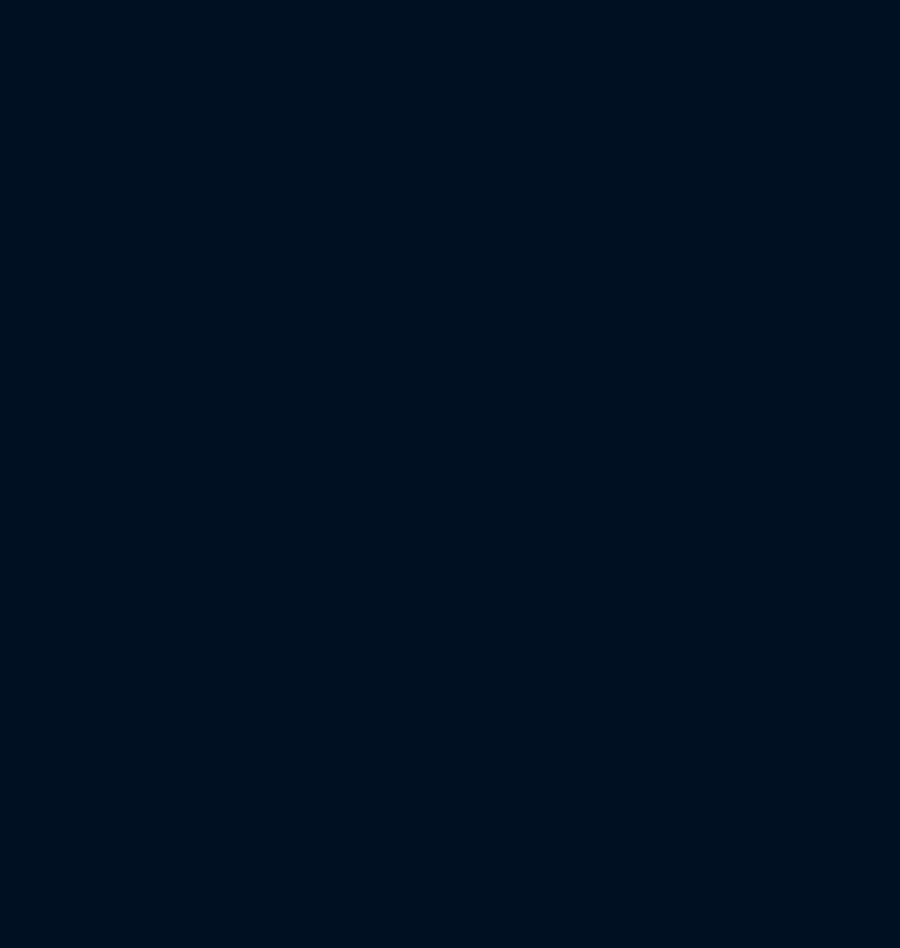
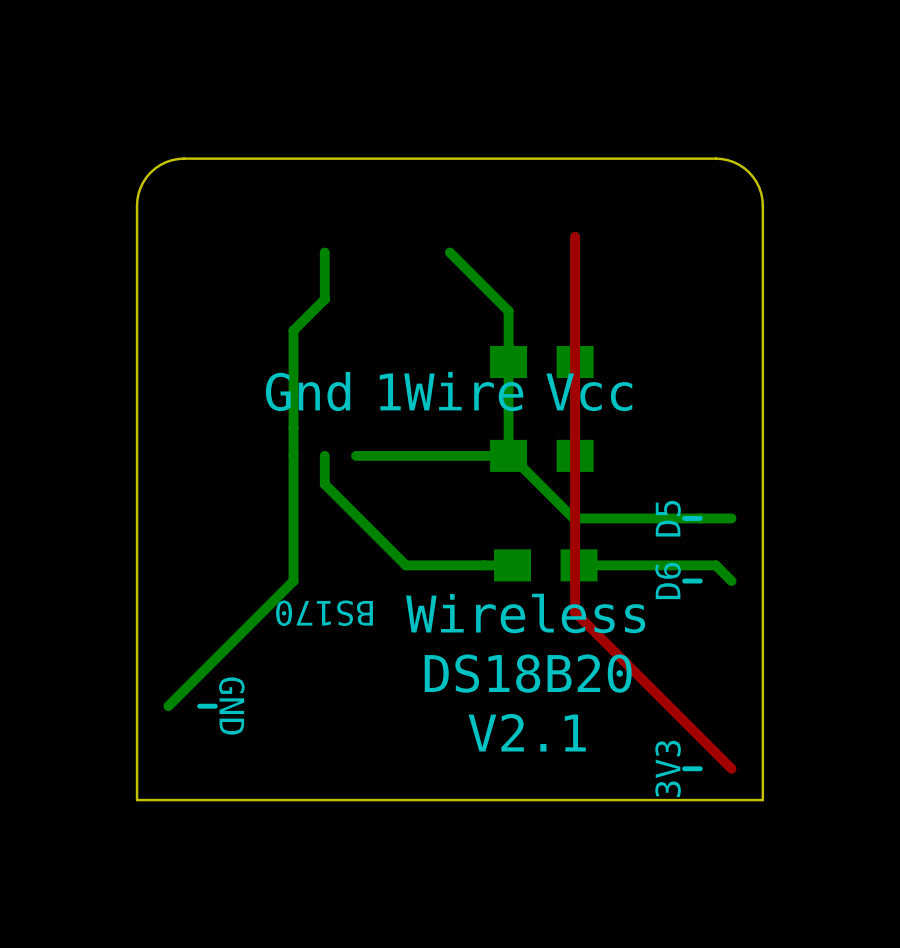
board edge: none -> (137, 205) (140, 187) (150, 172) (166, 162) (183, 158) (715, 158) (733, 162) (749, 172) (759, 187) (762, 205) (762, 800) (137, 800) (137, 205)
top track: none -> (575, 236) (575, 612) (731, 768)
bottom track: none -> (324, 252) (324, 299) (293, 330) (293, 581) (168, 706)
bottom track: none -> (449, 252) (508, 311) (508, 440)
part: none -> (541, 362)
text: none -> Gnd (308, 391)
text: none -> 1Wire (451, 391)
text: none -> Vcc (589, 392)
bottom track: none -> (324, 455) (324, 484) (405, 565) (512, 565)
bottom track: none -> (356, 455) (511, 455) (573, 518) (731, 518)
part: none -> (541, 455)
text: none -> D5 (668, 518)
line: none -> (684, 518) (700, 518)
part: none -> (545, 565)
bottom track: none -> (579, 565) (715, 565) (731, 581)
text: none -> D6 (668, 581)
line: none -> (684, 581) (700, 581)
text: none -> BS170 (324, 613)
text: none -> Wireless (525, 613)
text: none -> DS18B20 (528, 673)
line: none -> (199, 706) (215, 706)
text: none -> GND (231, 706)
text: none -> V2.1 (527, 732)
text: none -> 3V3 (668, 768)
line: none -> (684, 768) (700, 768)

